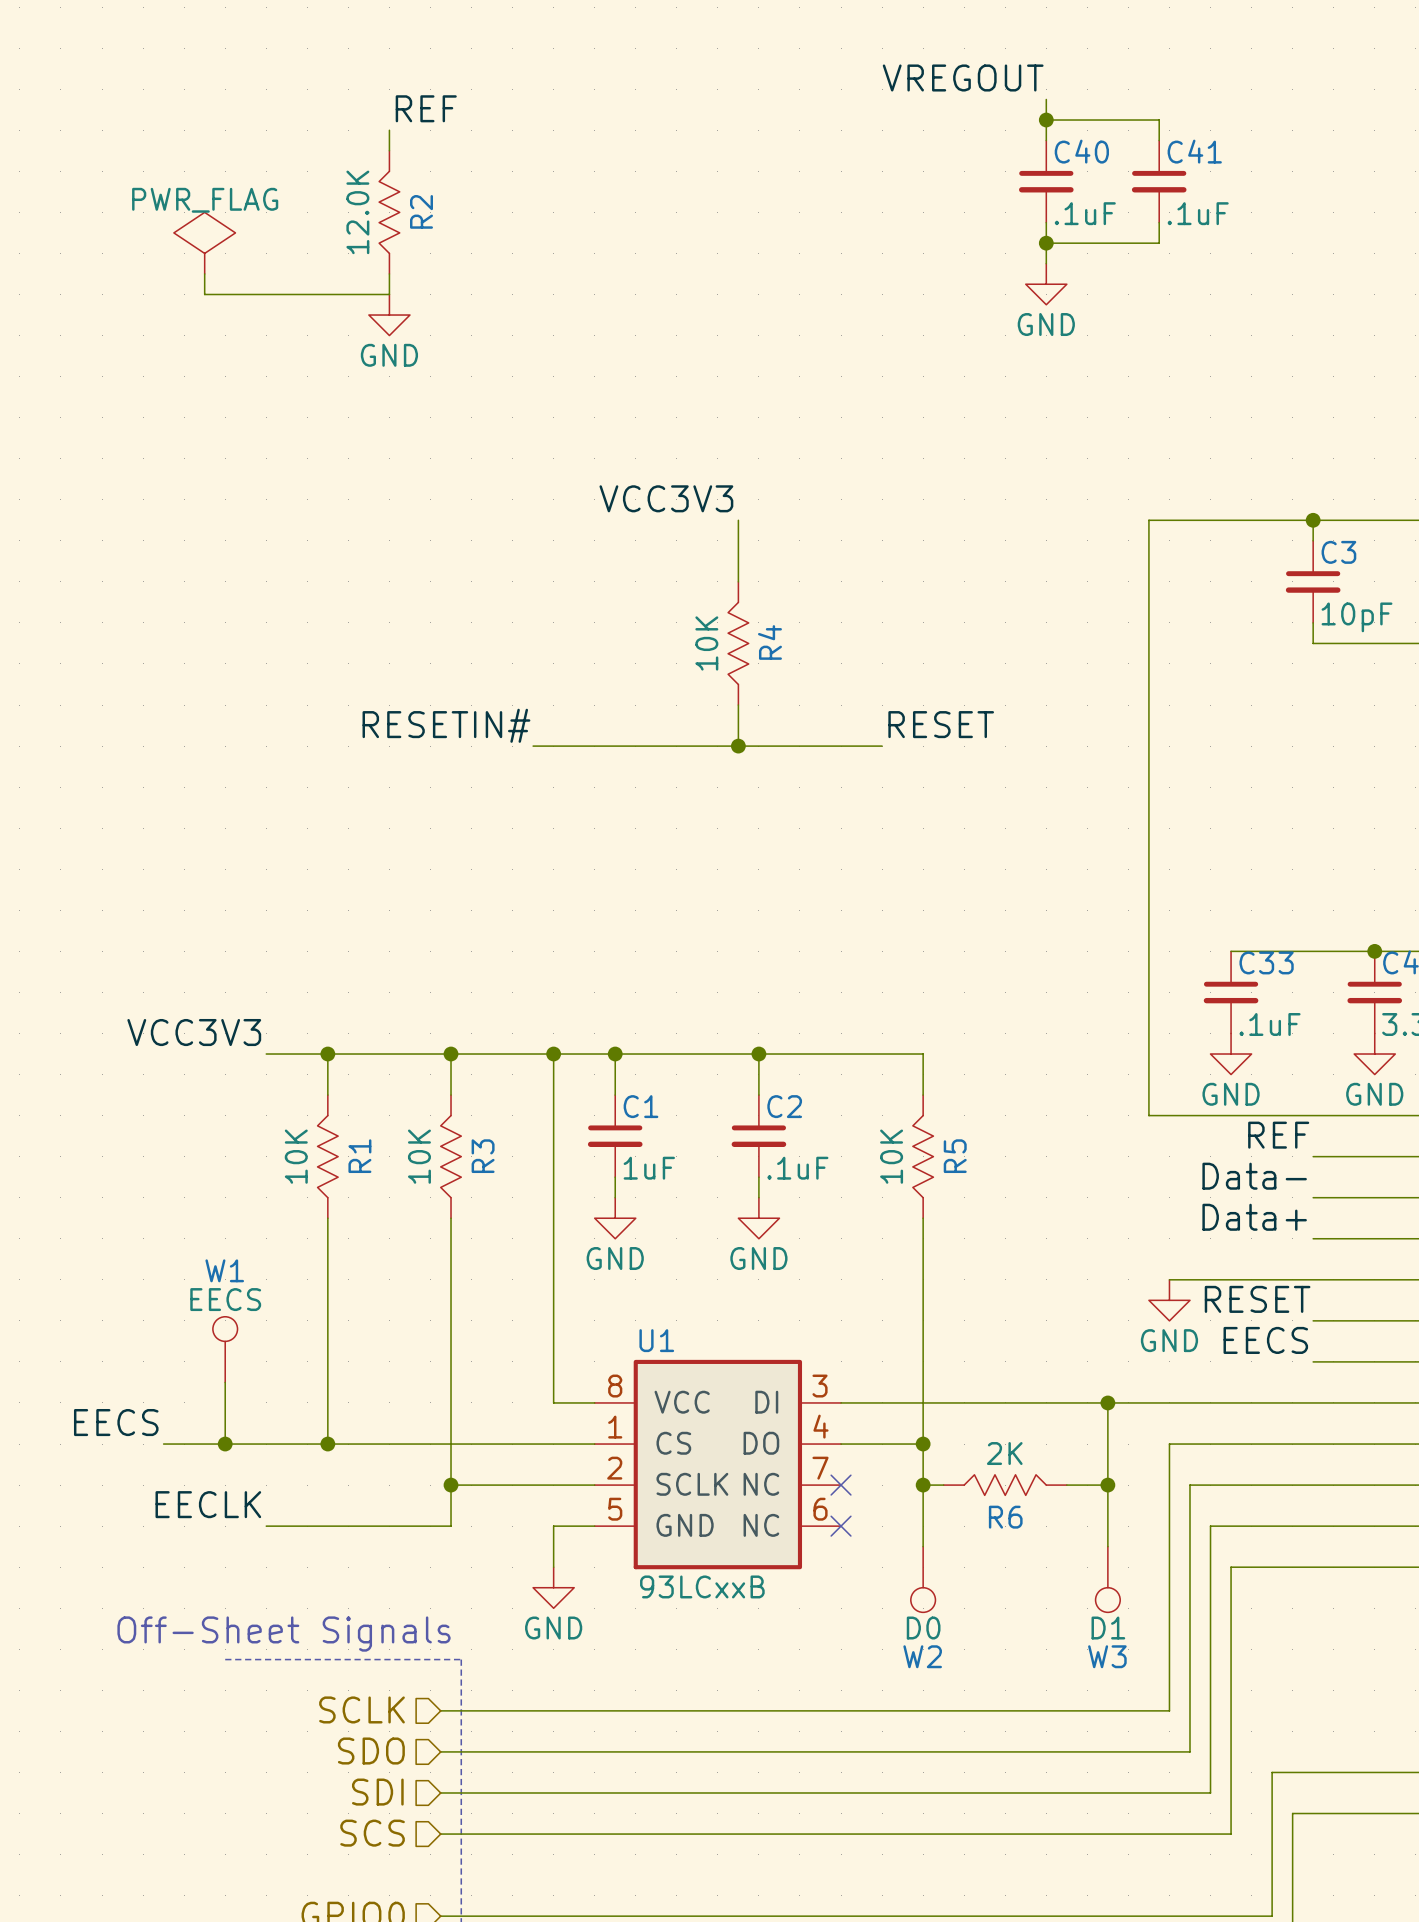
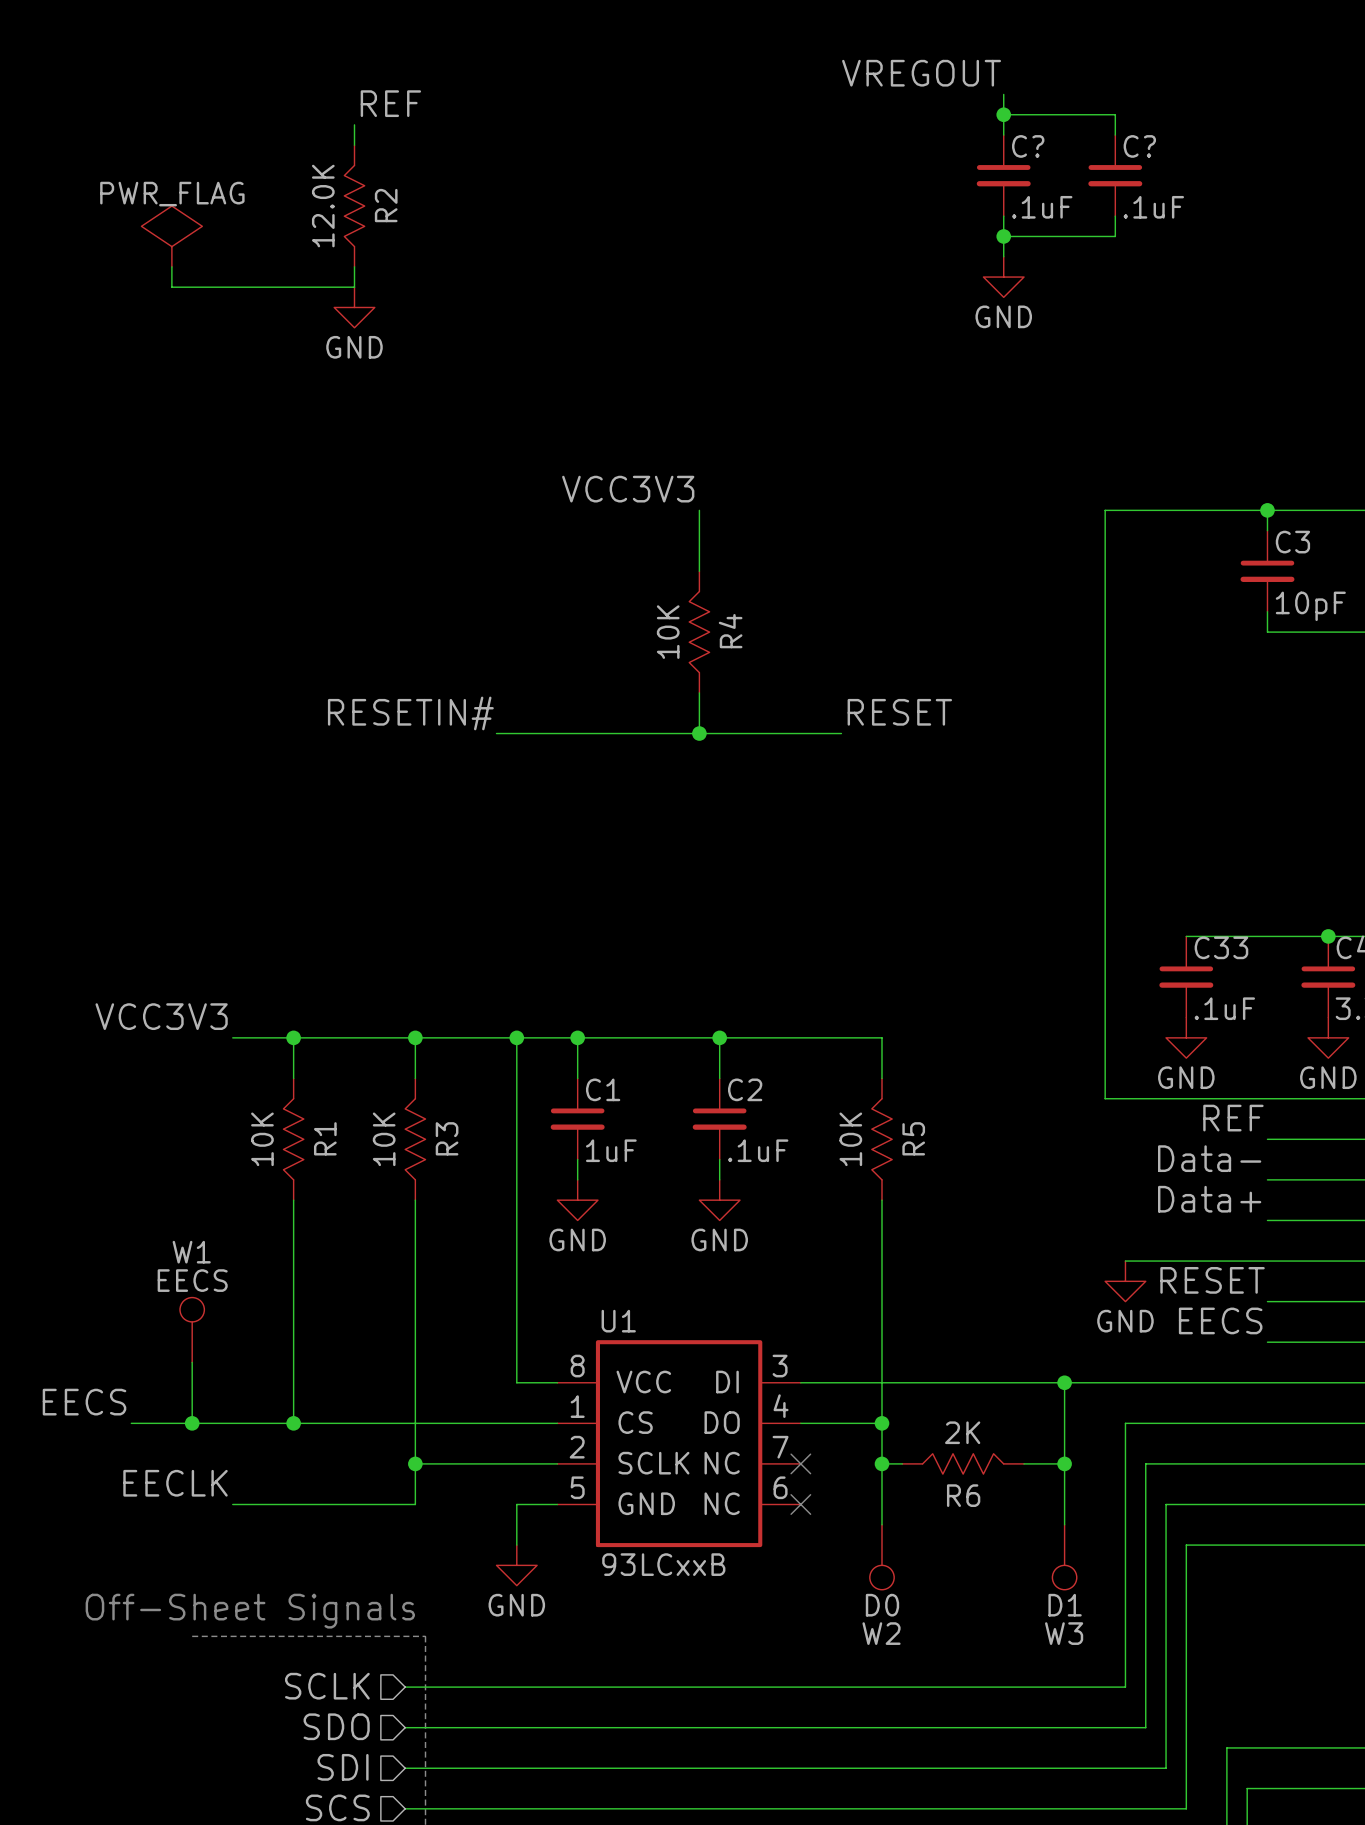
C40 name: C40 (1081, 151) -> C? (1028, 146)
C41 name: C41 (1194, 151) -> C? (1139, 146)

